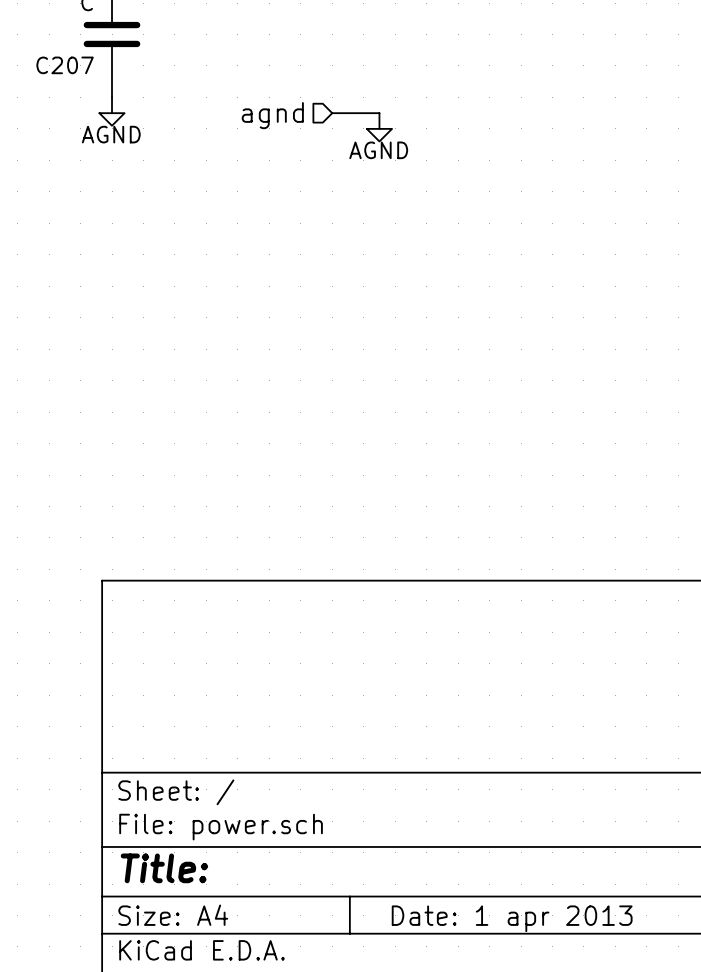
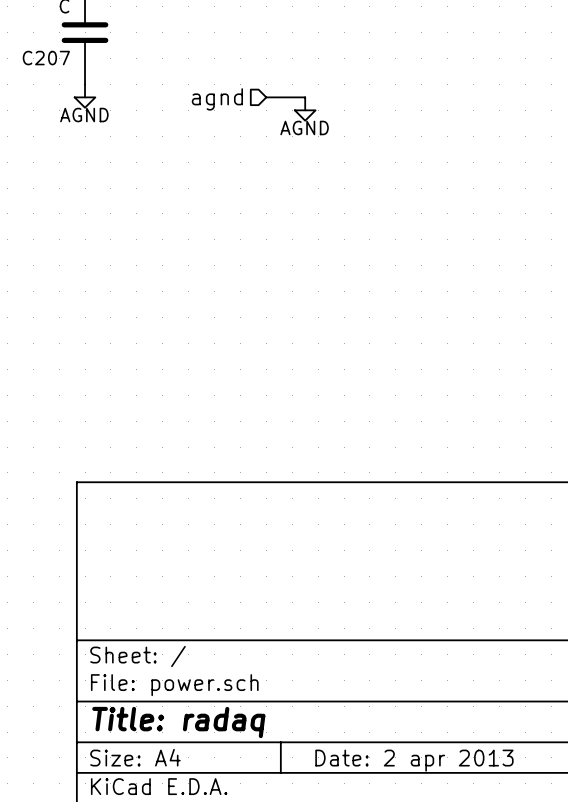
title block: Title: (164, 868) -> Title: radaq (178, 722)
title block: Date: 1 apr 2013 (512, 918) -> Date: 2 apr 2013 (414, 760)

